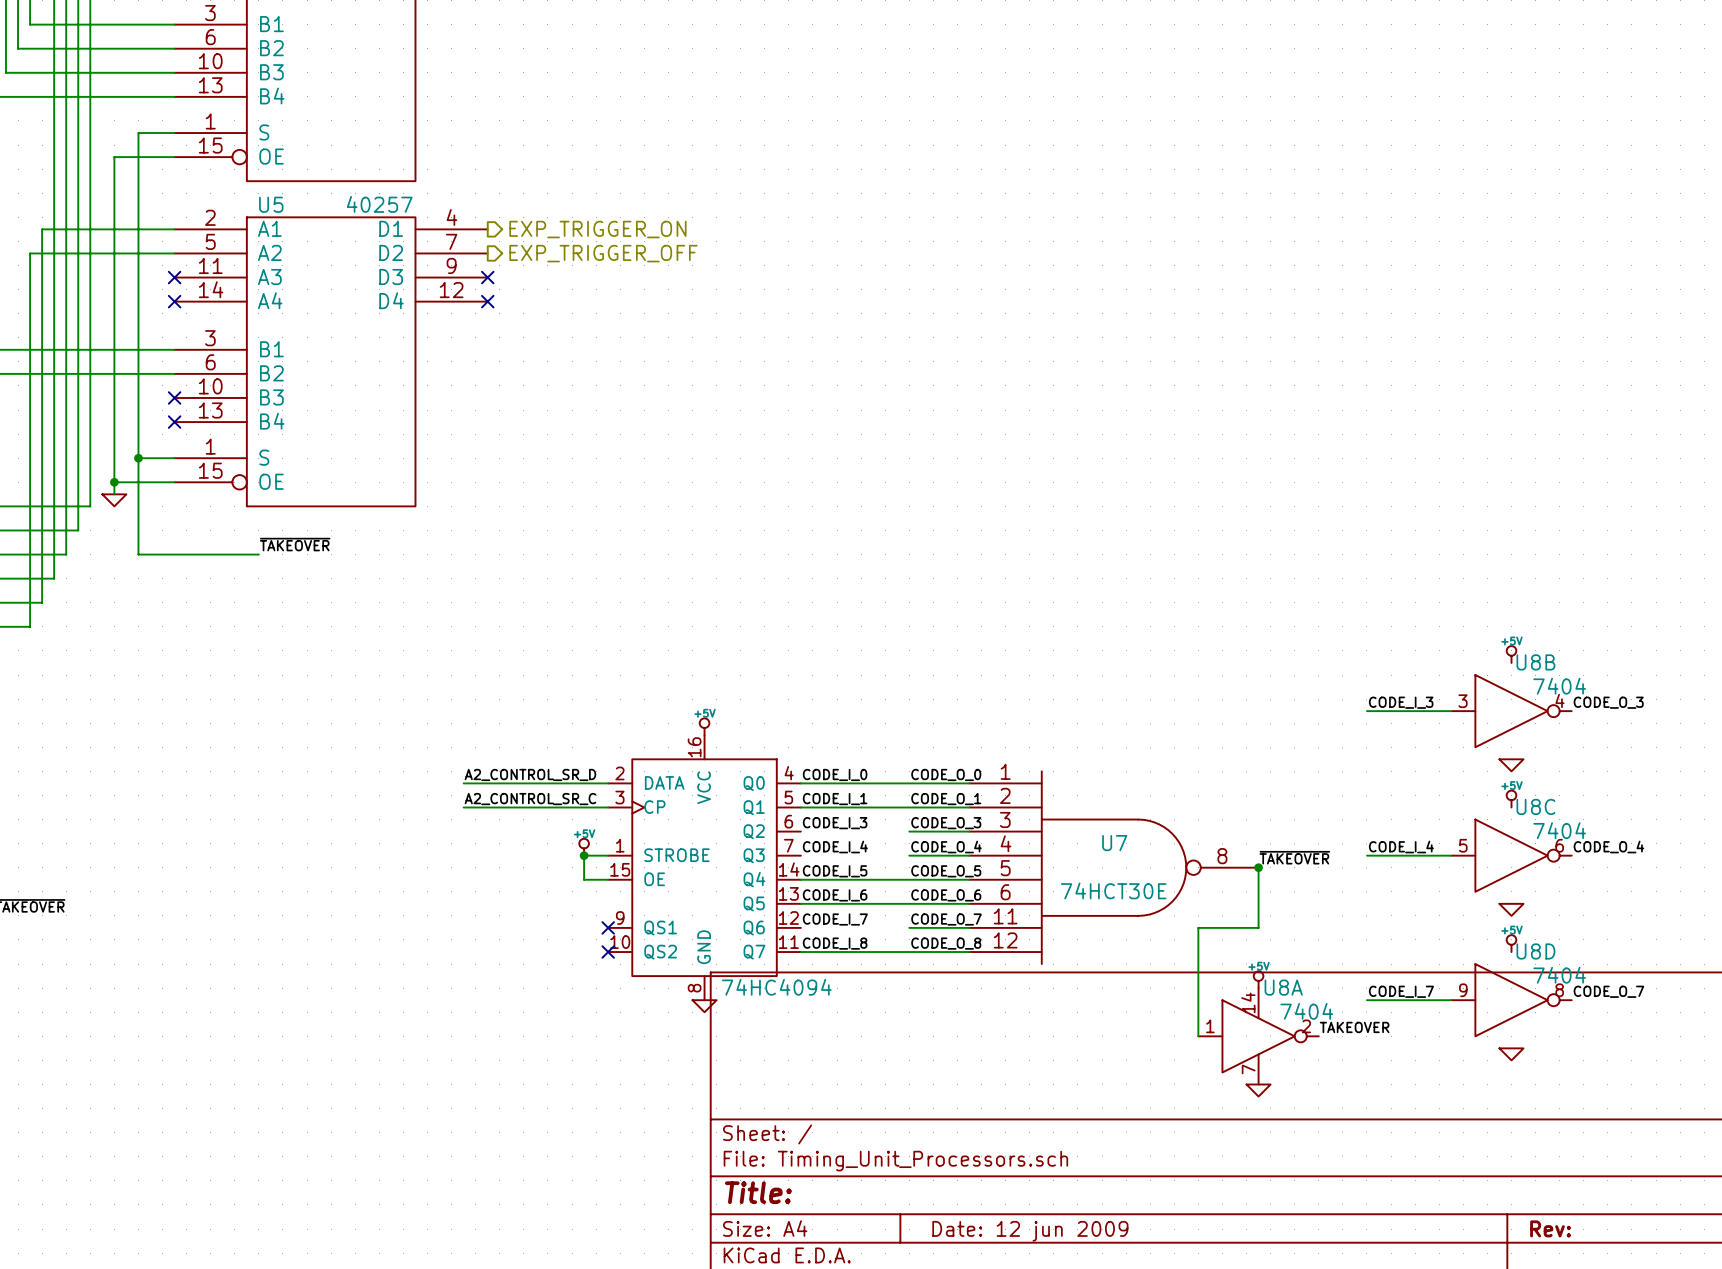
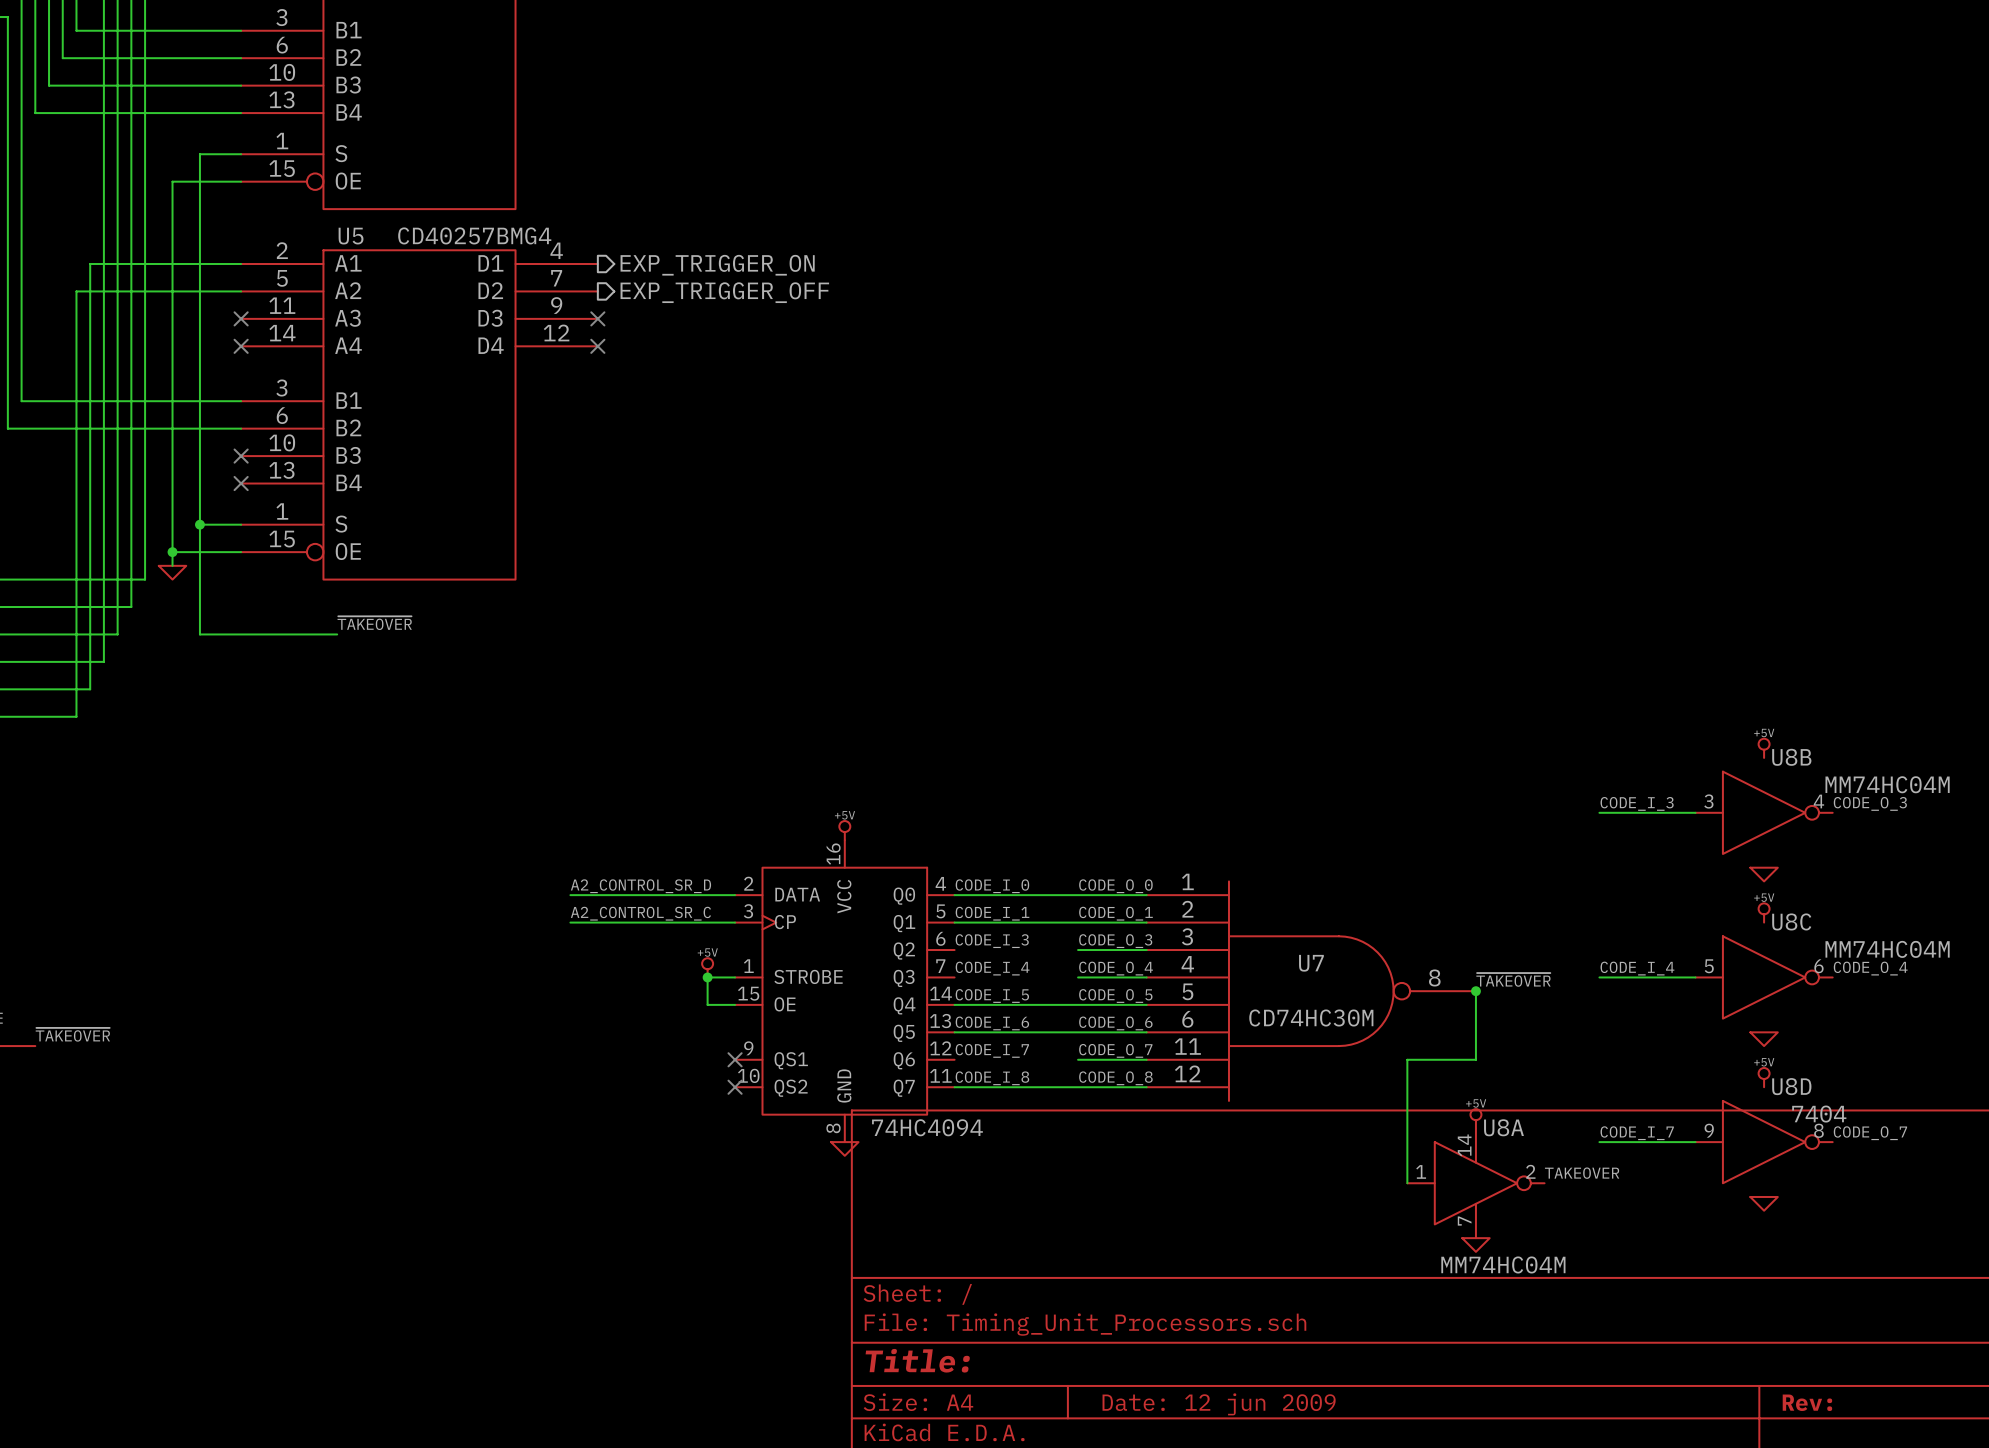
U5 value: 40257 (379, 204) -> CD40257BMG4 (474, 235)
U8B value: 7404 (1559, 686) -> MM74HC04M (1887, 784)
U8C value: 7404 (1559, 830) -> MM74HC04M (1887, 949)
U7 value: 74HCT30E (1113, 890) -> CD74HC30M (1311, 1018)
U8A value: 7404 (1306, 1011) -> MM74HC04M (1503, 1264)

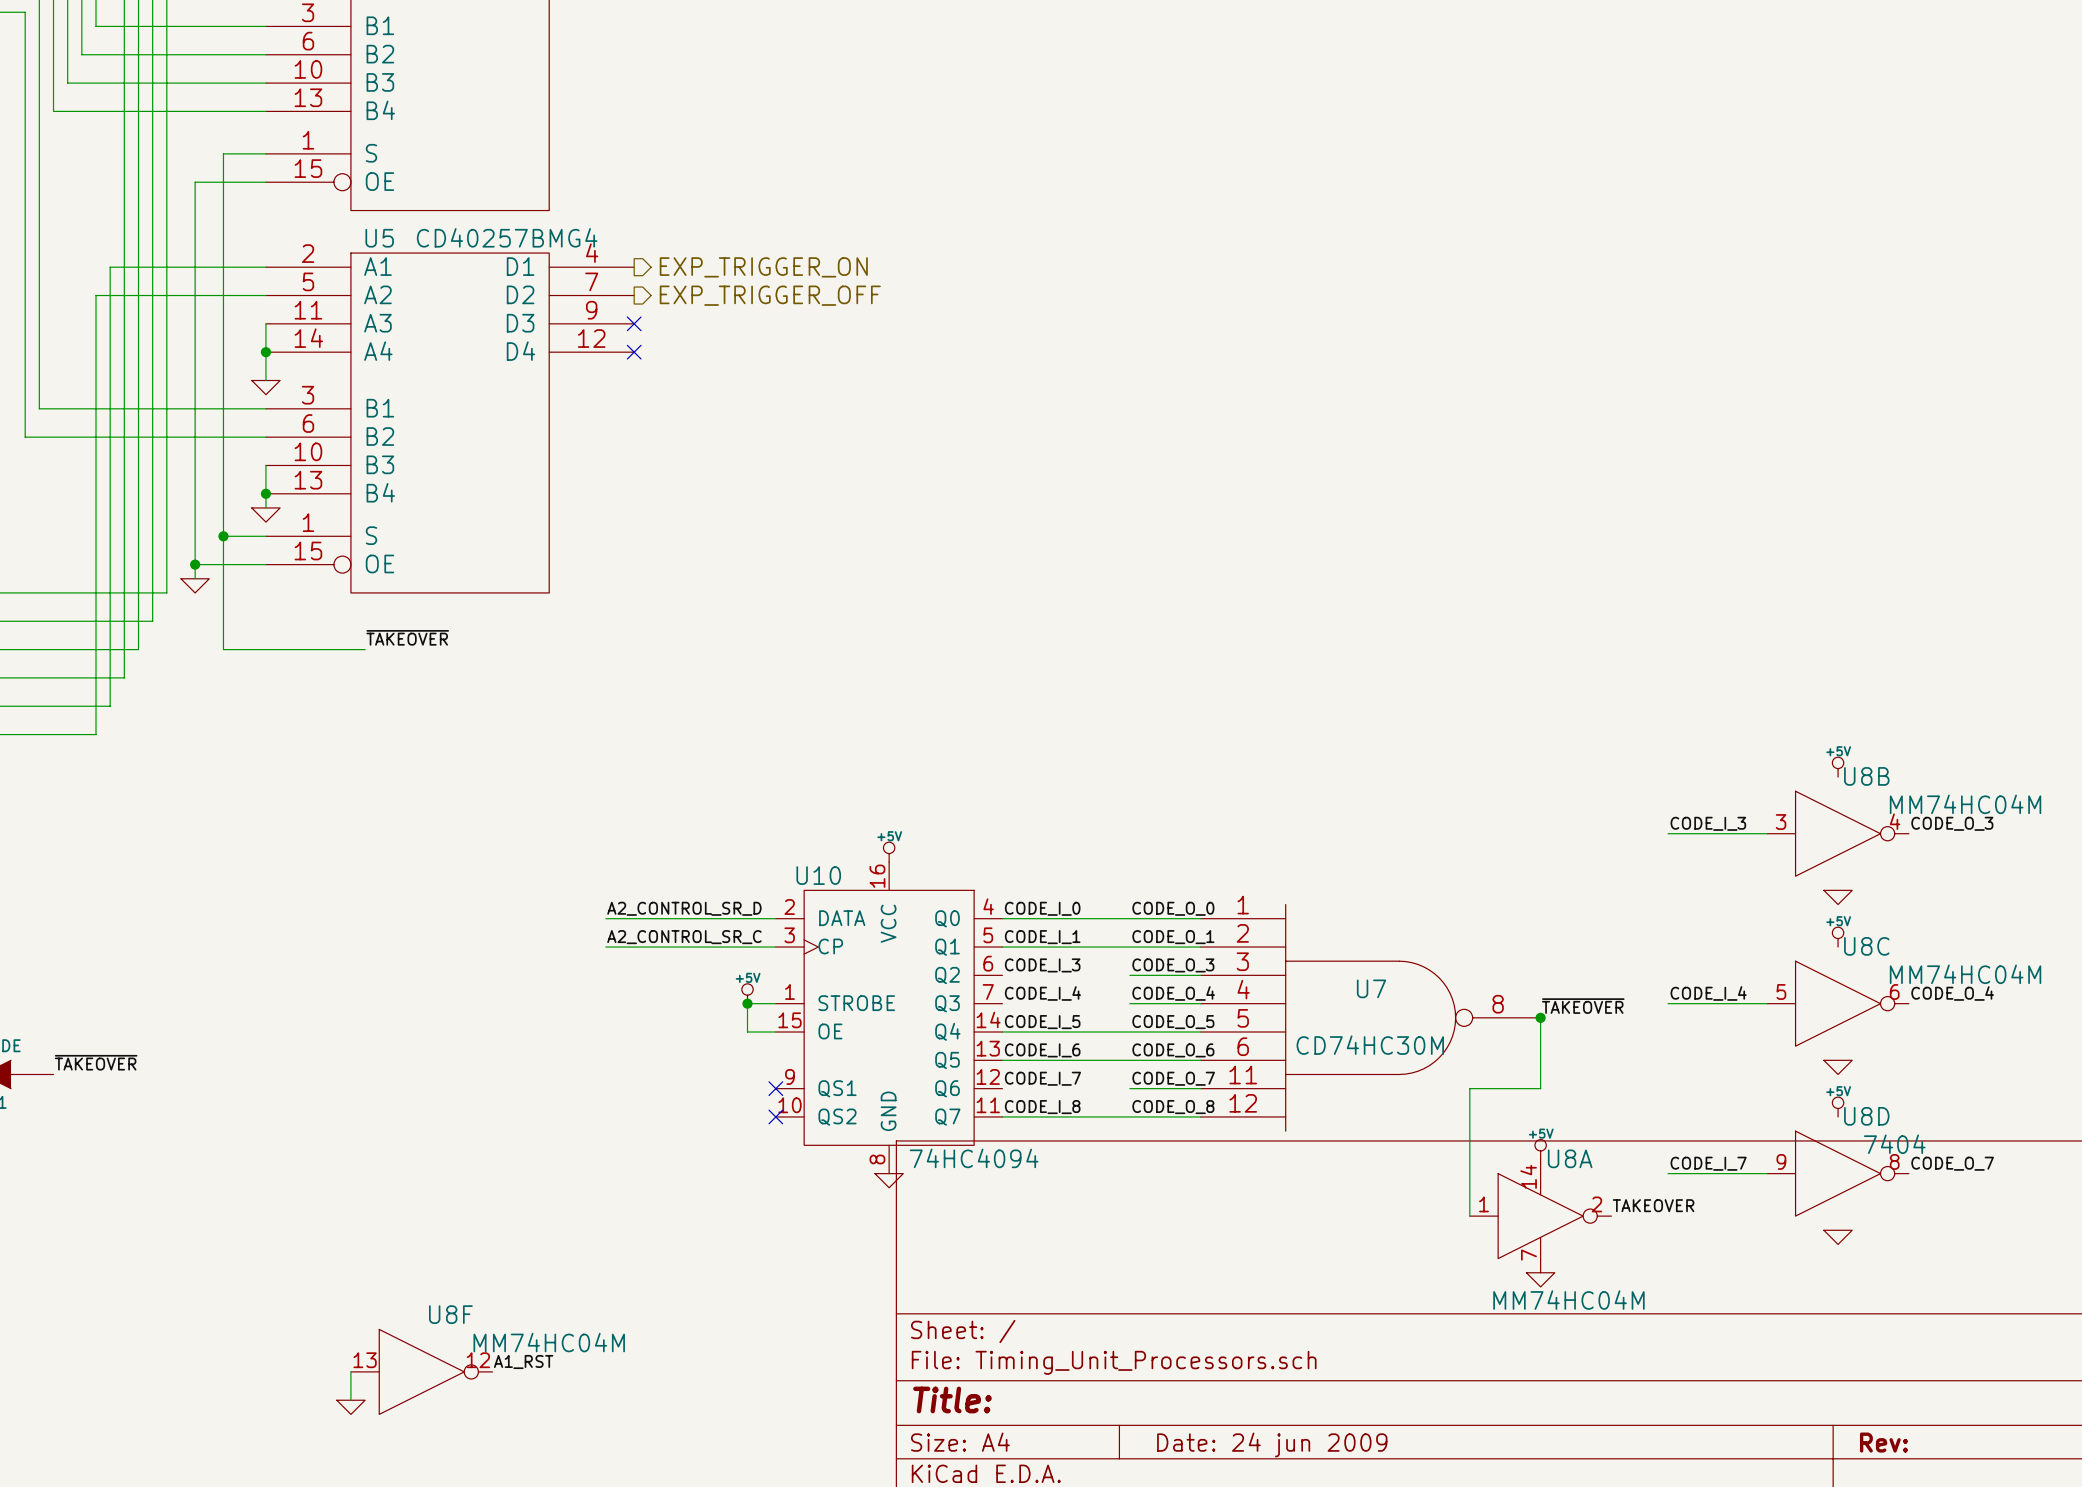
wire: none -> (265, 323) (265, 380)
no-connect mark: (241, 318) -> none
no-connect mark: (241, 346) -> none
junction: none -> (265, 352)
power symbol: none -> (265, 387)
wire: none -> (265, 465) (265, 507)
no-connect mark: (241, 456) -> none
no-connect mark: (241, 483) -> none
junction: none -> (265, 493)
power symbol: none -> (265, 515)
U10: none -> 74HC4094 (889, 1017)
label: none -> A1_RST (523, 1362)
wire: none -> (350, 1371) (350, 1400)
U8F: none -> MM74HC04M (421, 1371)
power symbol: none -> (350, 1407)
title block: Date: 12 jun 2009 (1219, 1404) -> Date: 24 jun 2009 (1272, 1444)

